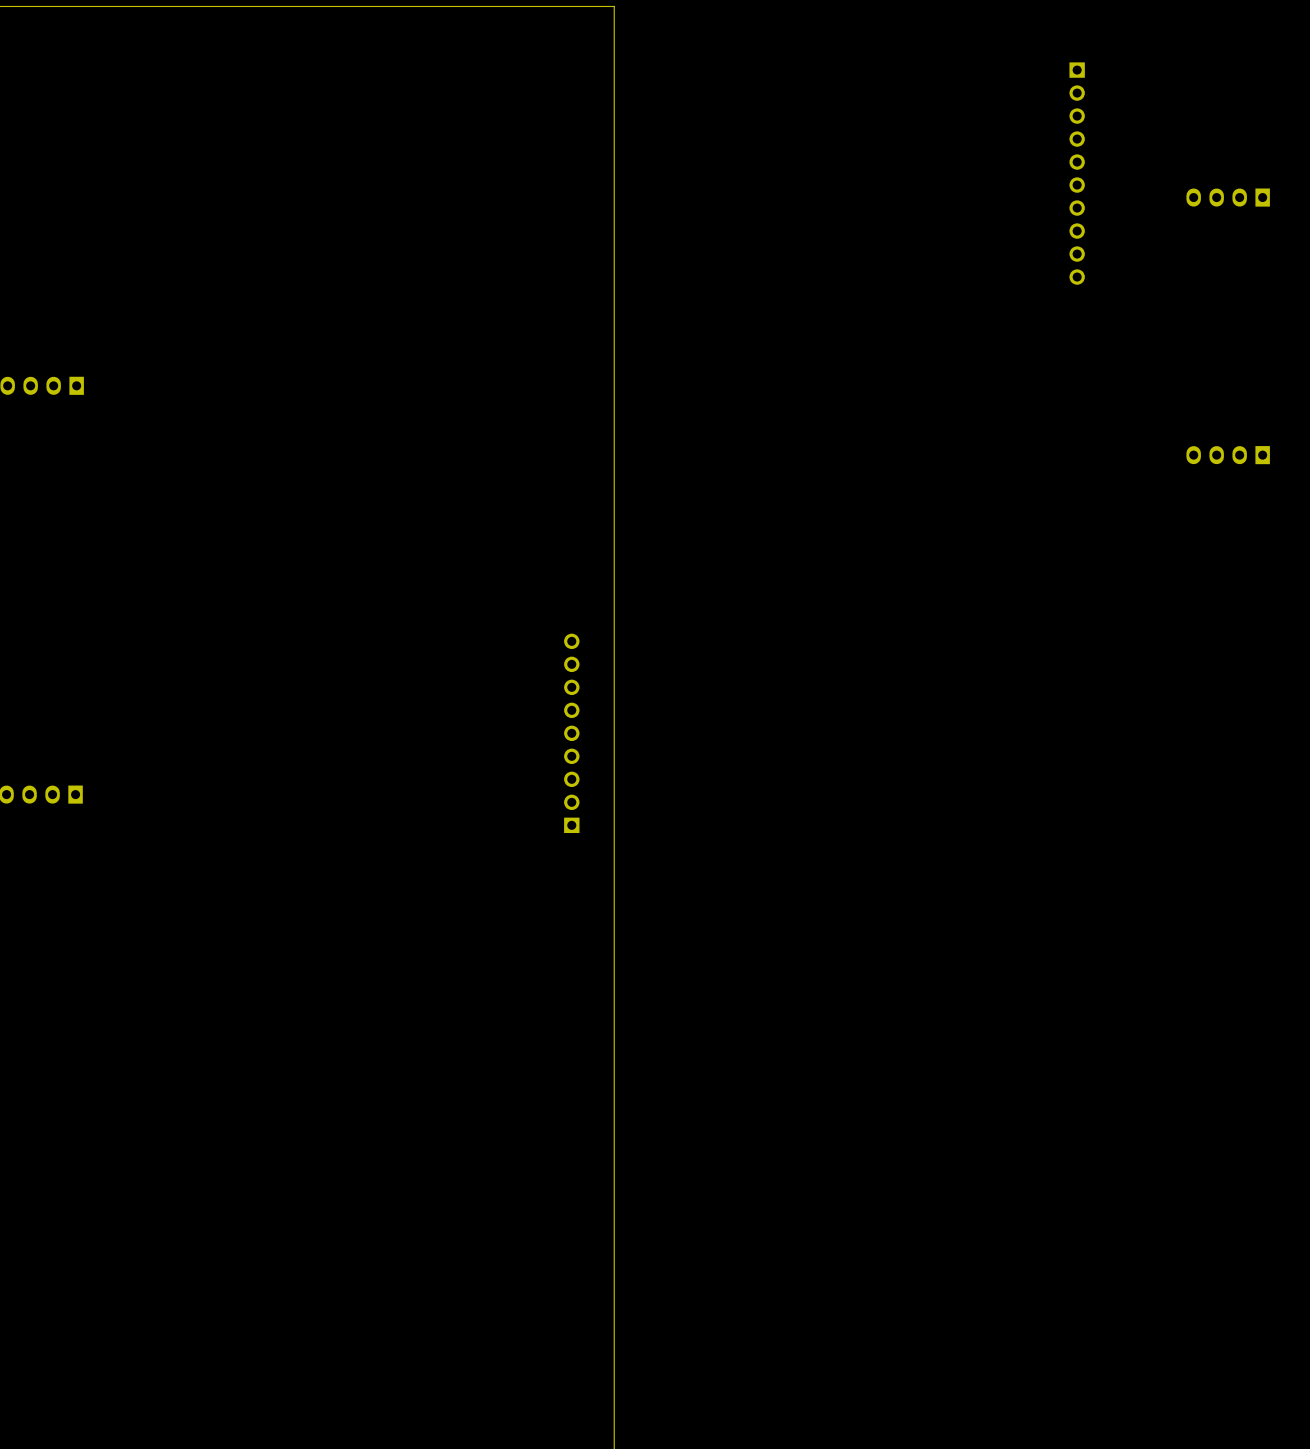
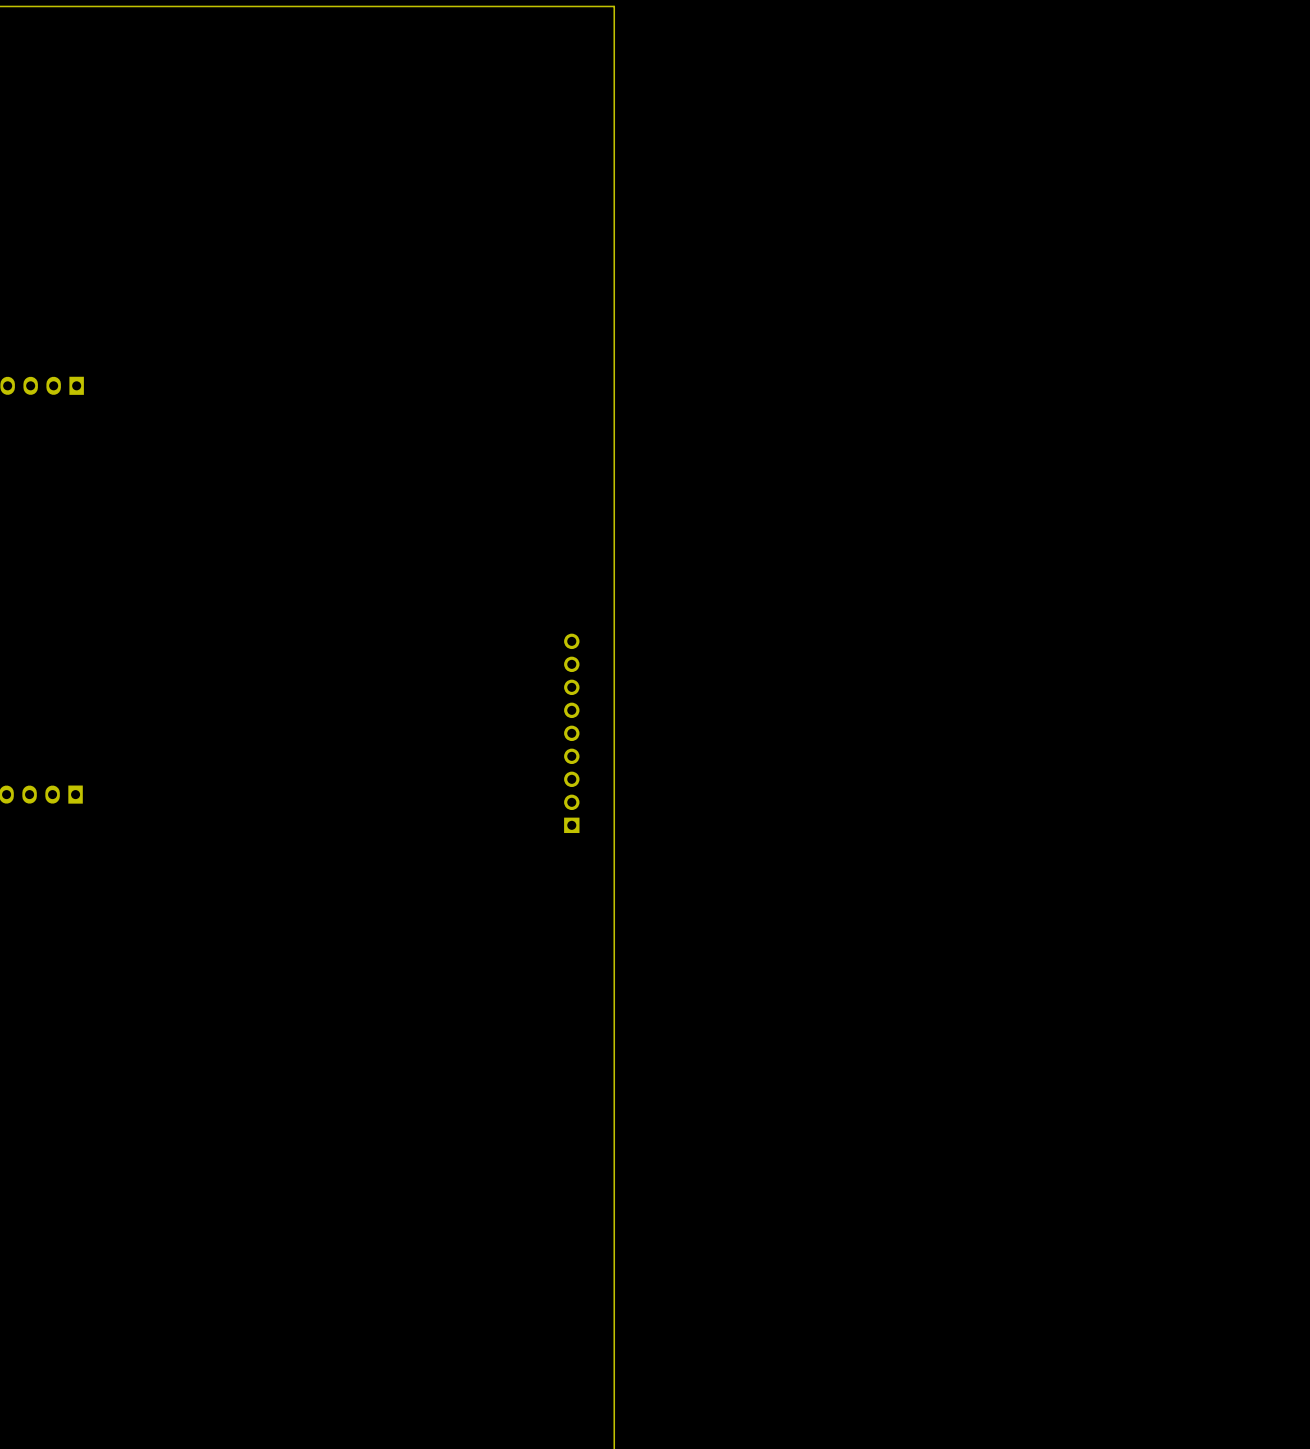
part: (1077, 173) -> none
part: (1228, 197) -> none
part: (1228, 455) -> none

